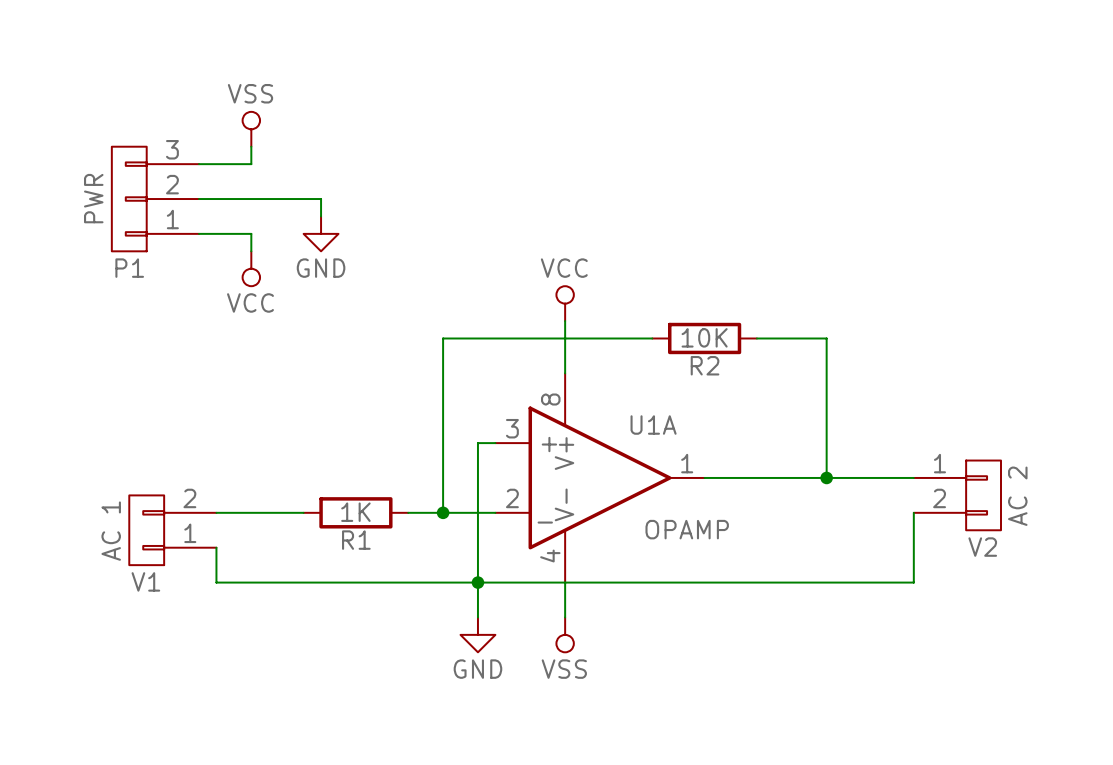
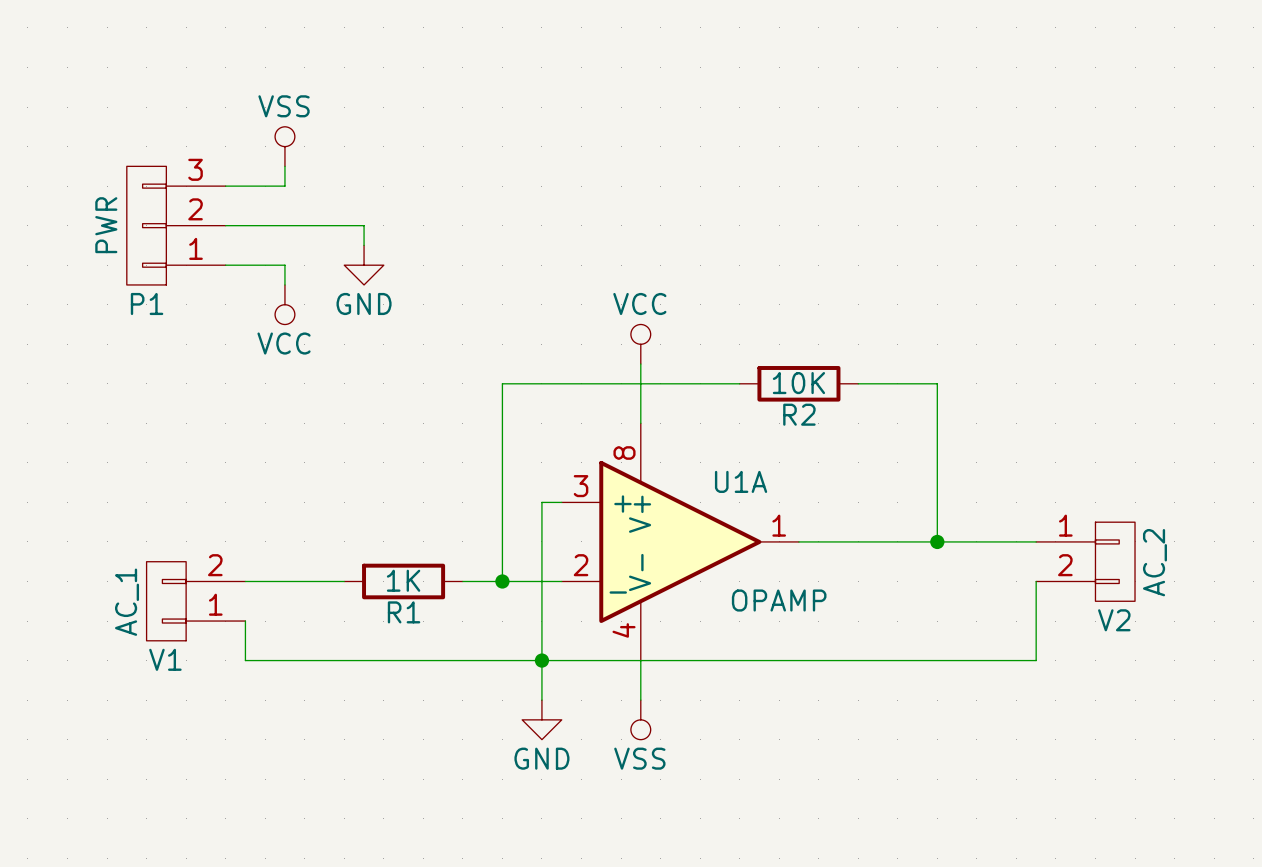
V2 value: AC 2 (1017, 496) -> AC_2 (1154, 562)
V1 value: AC 1 (111, 531) -> AC_1 (127, 602)

